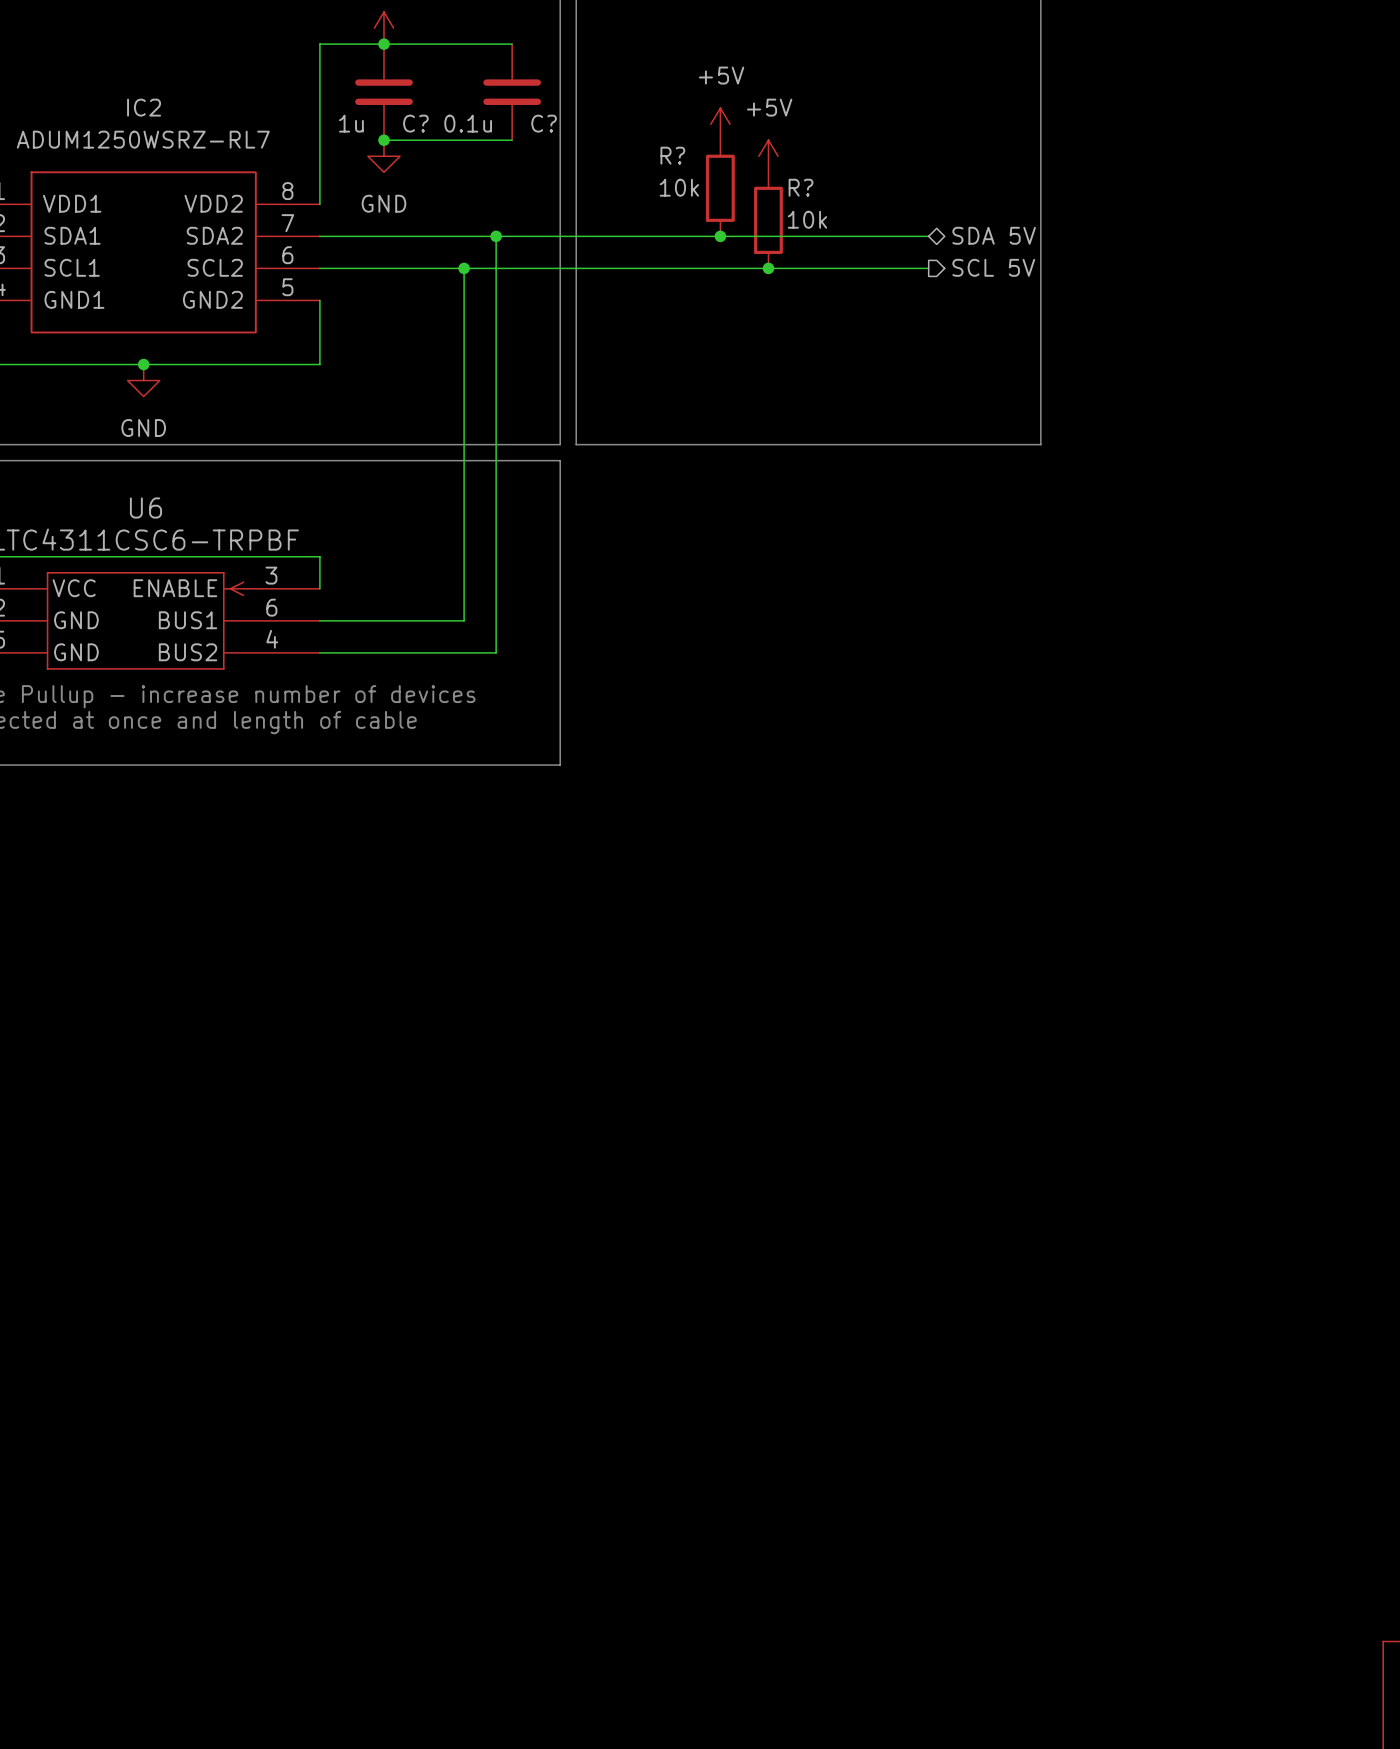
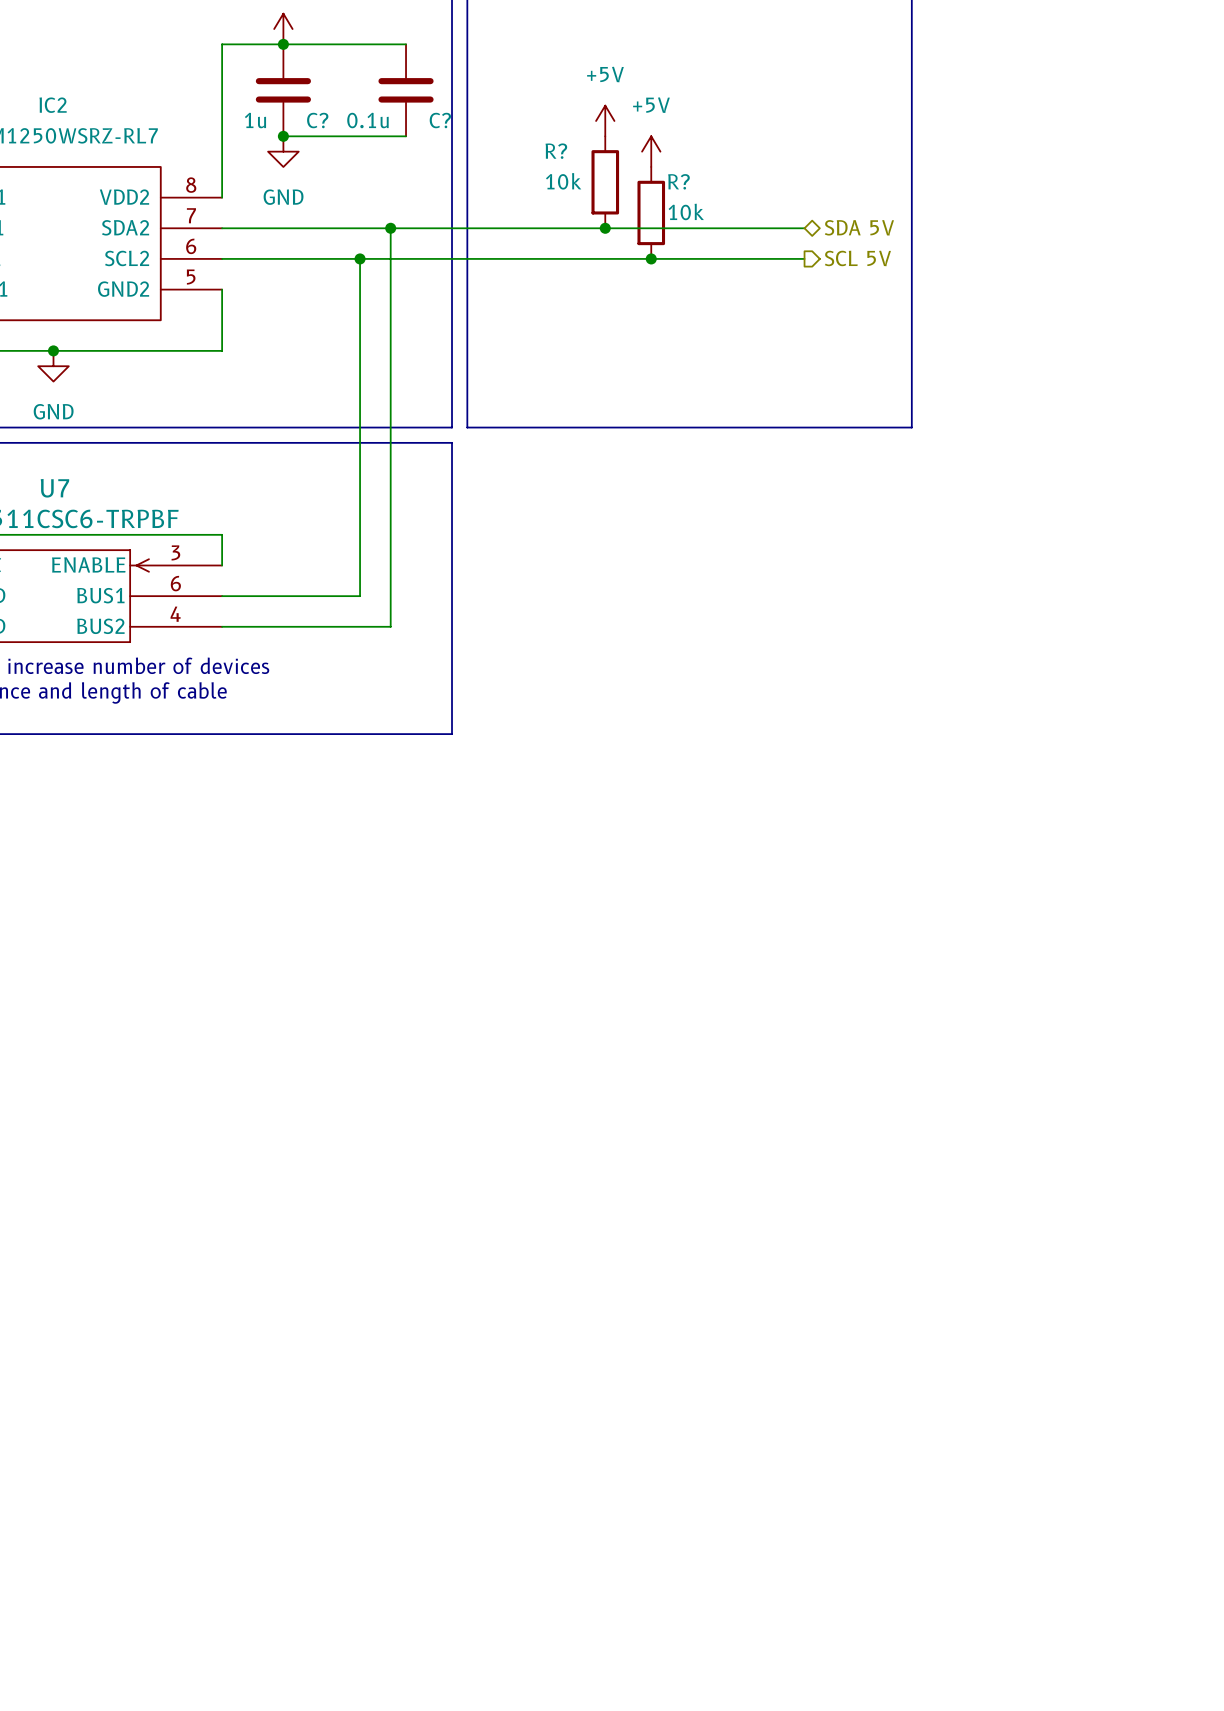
U6 name: U6 (145, 507) -> U7 (54, 488)

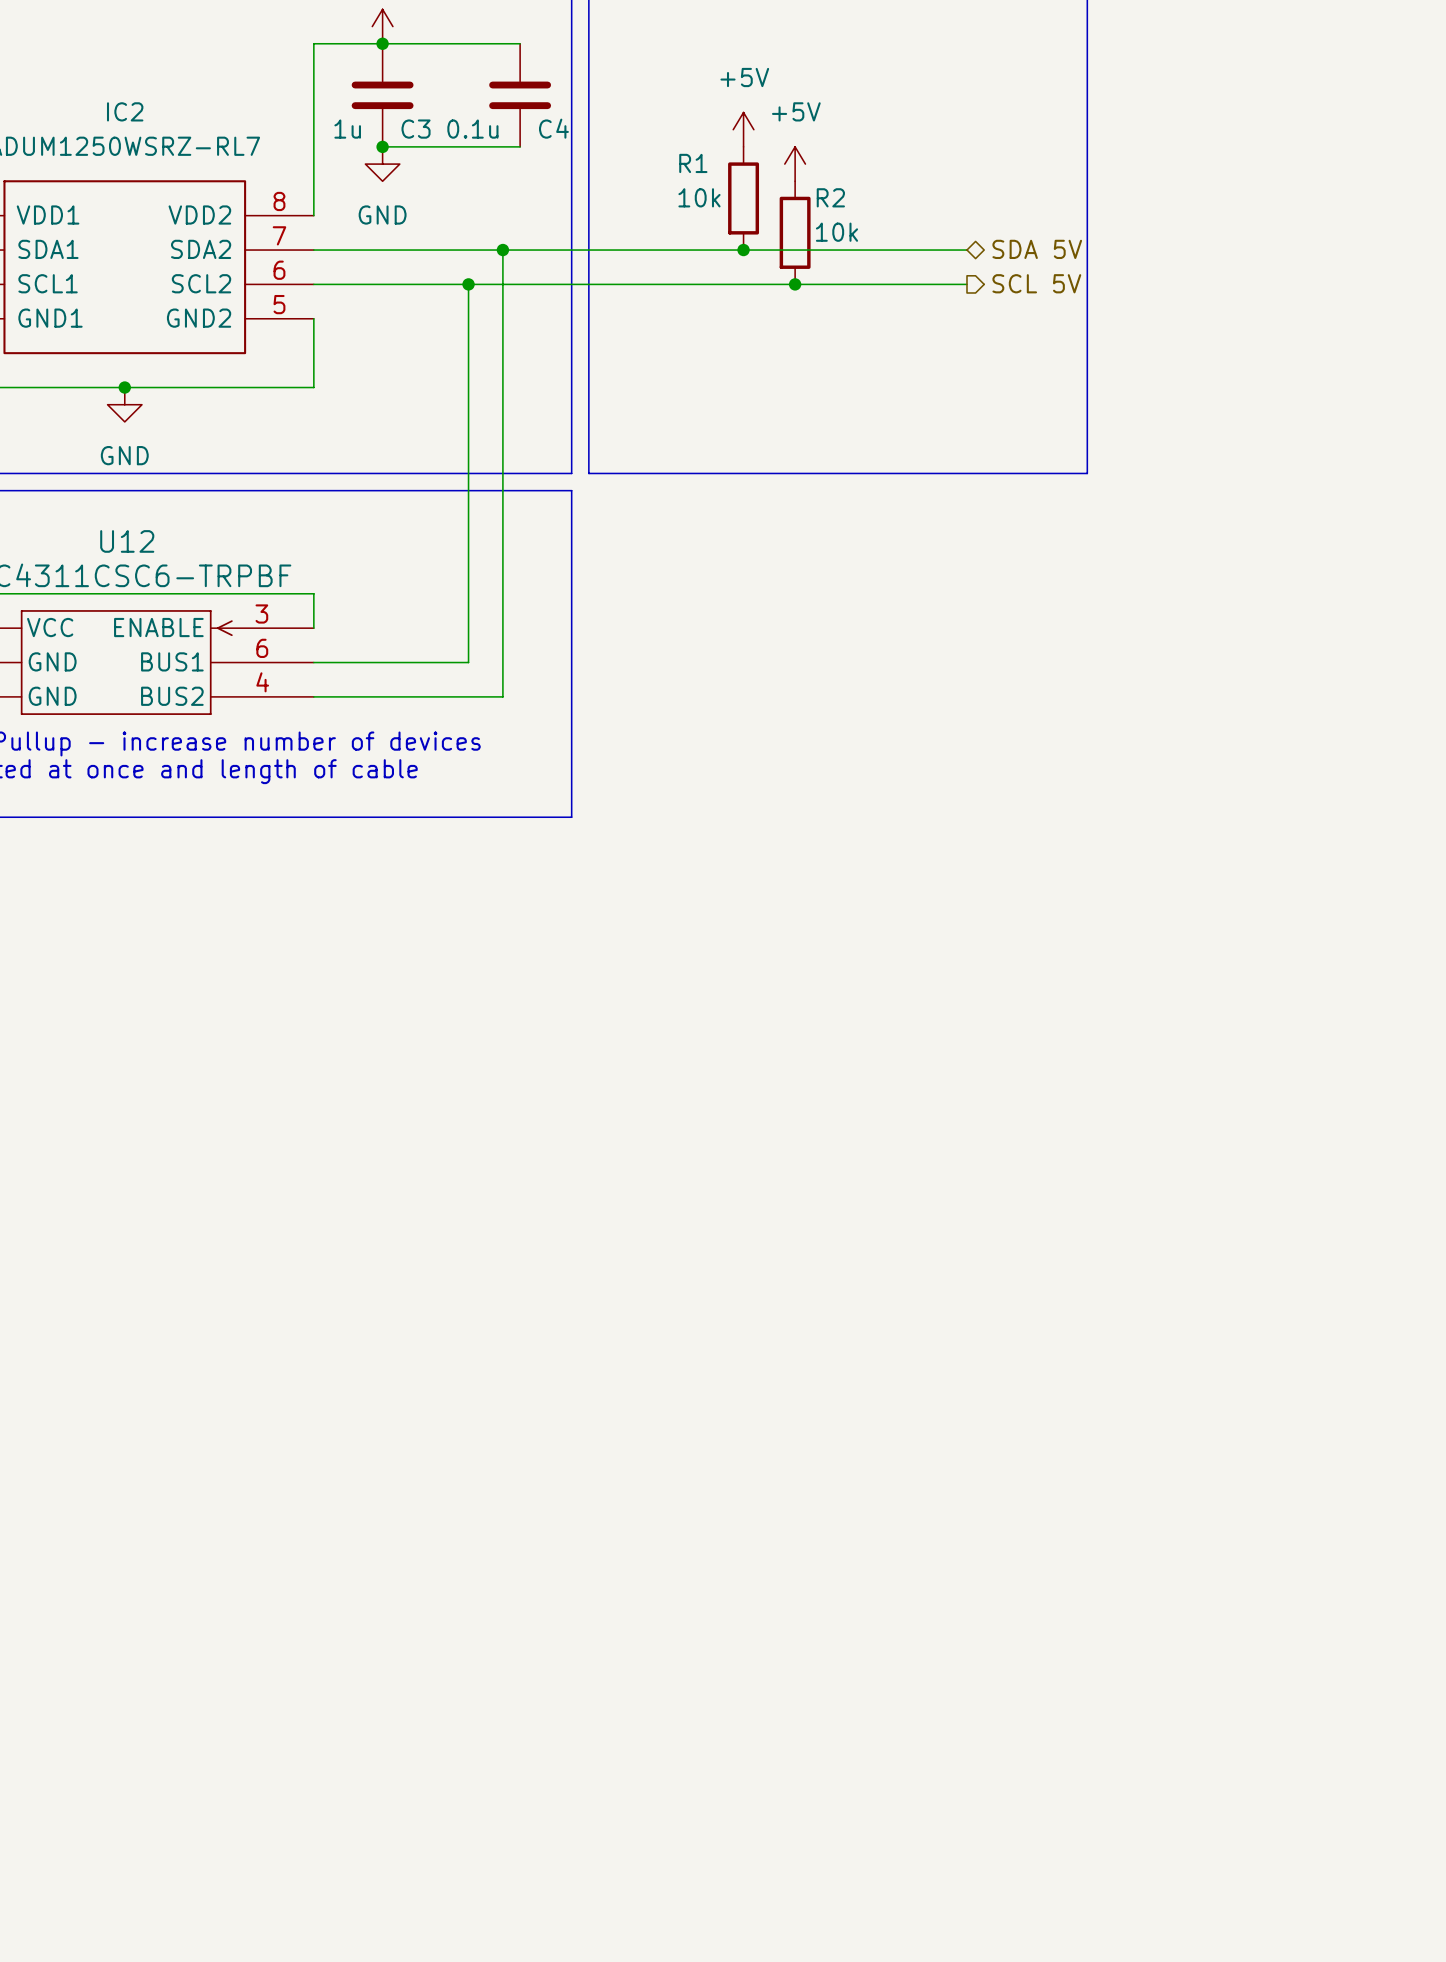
C? name: C? (317, 120) -> C3 (416, 129)
C? name: C? (440, 120) -> C4 (553, 128)
R? name: R? (556, 151) -> R1 (693, 163)
R? name: R? (678, 181) -> R2 (830, 197)
U7 name: U7 (54, 488) -> U12 (127, 541)

